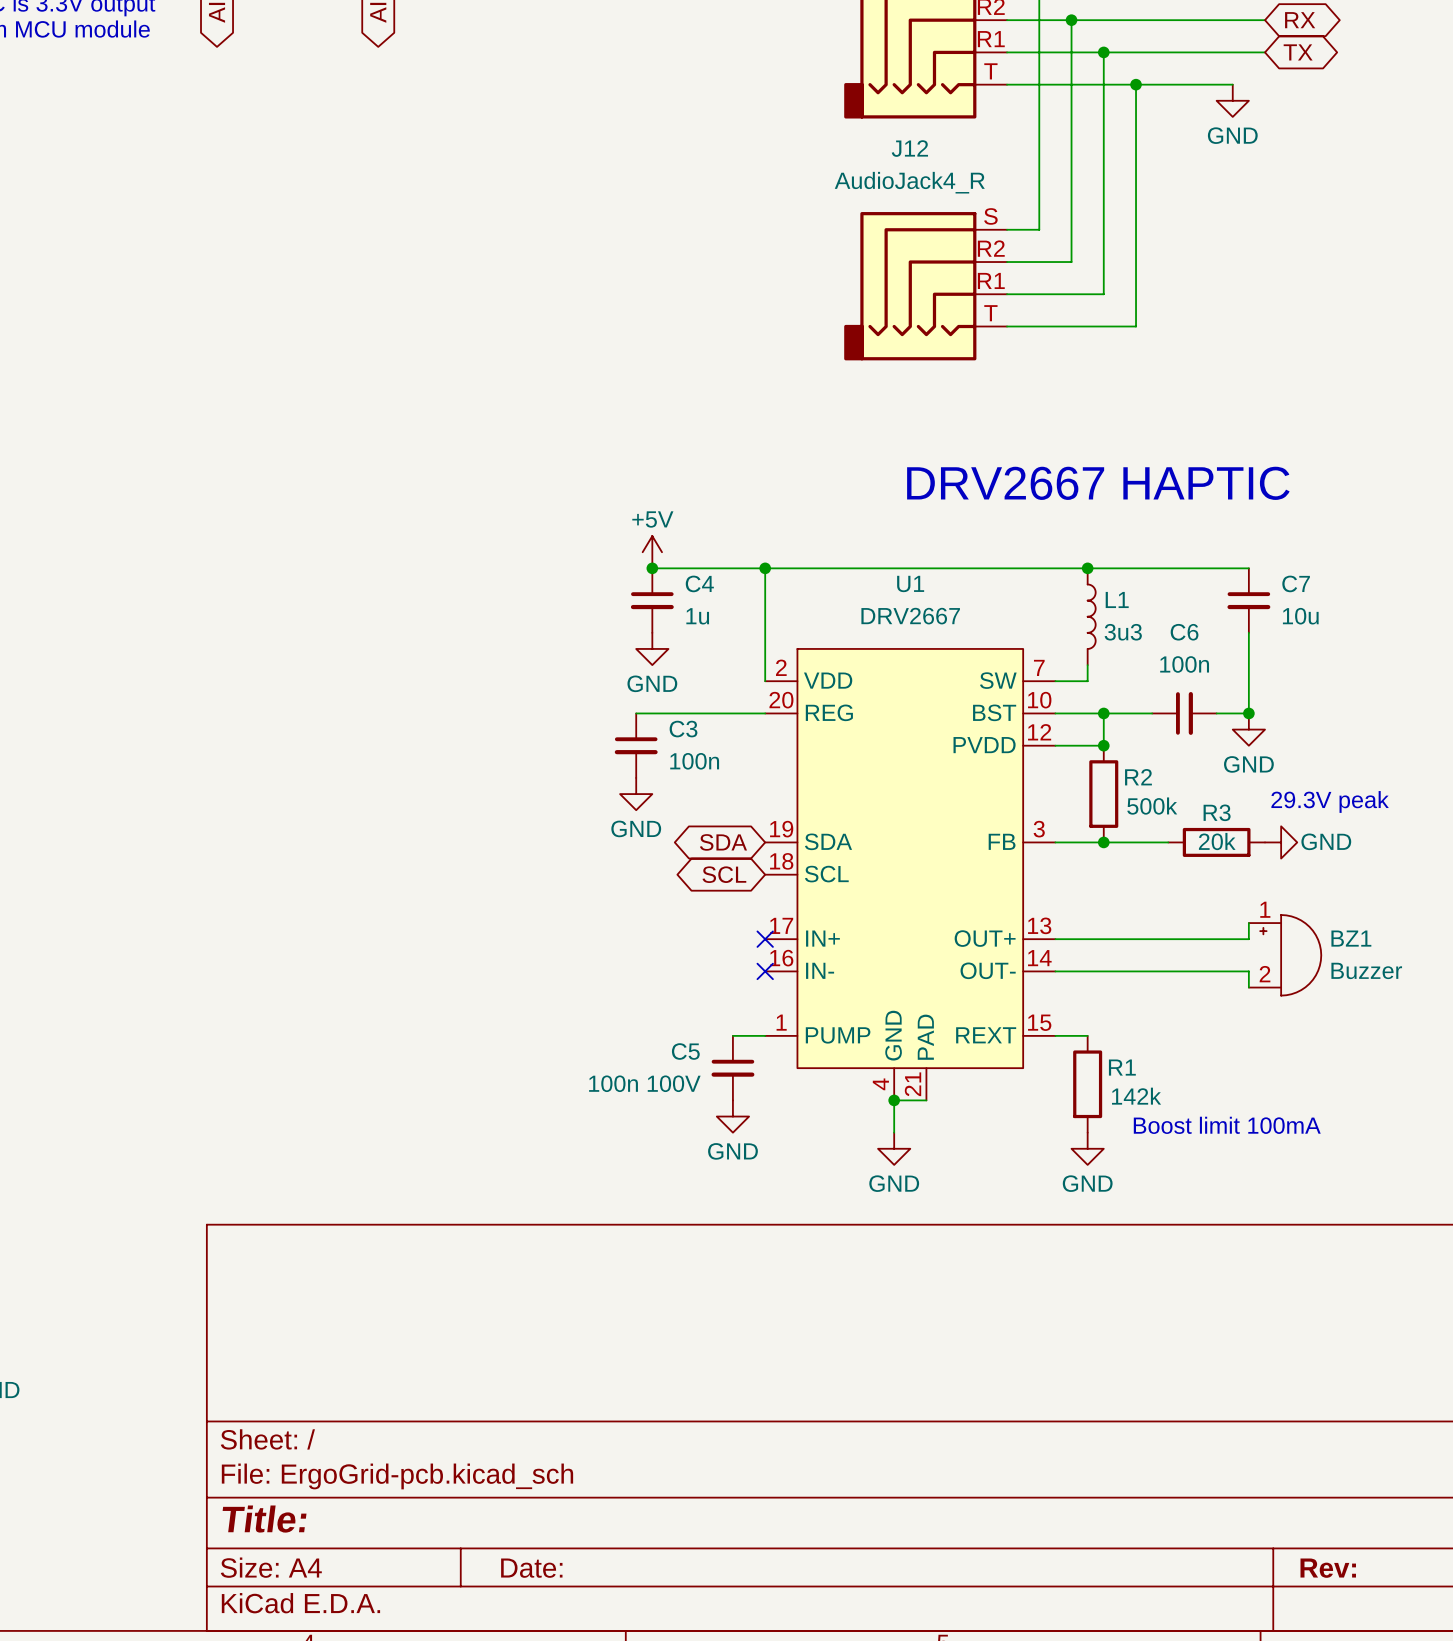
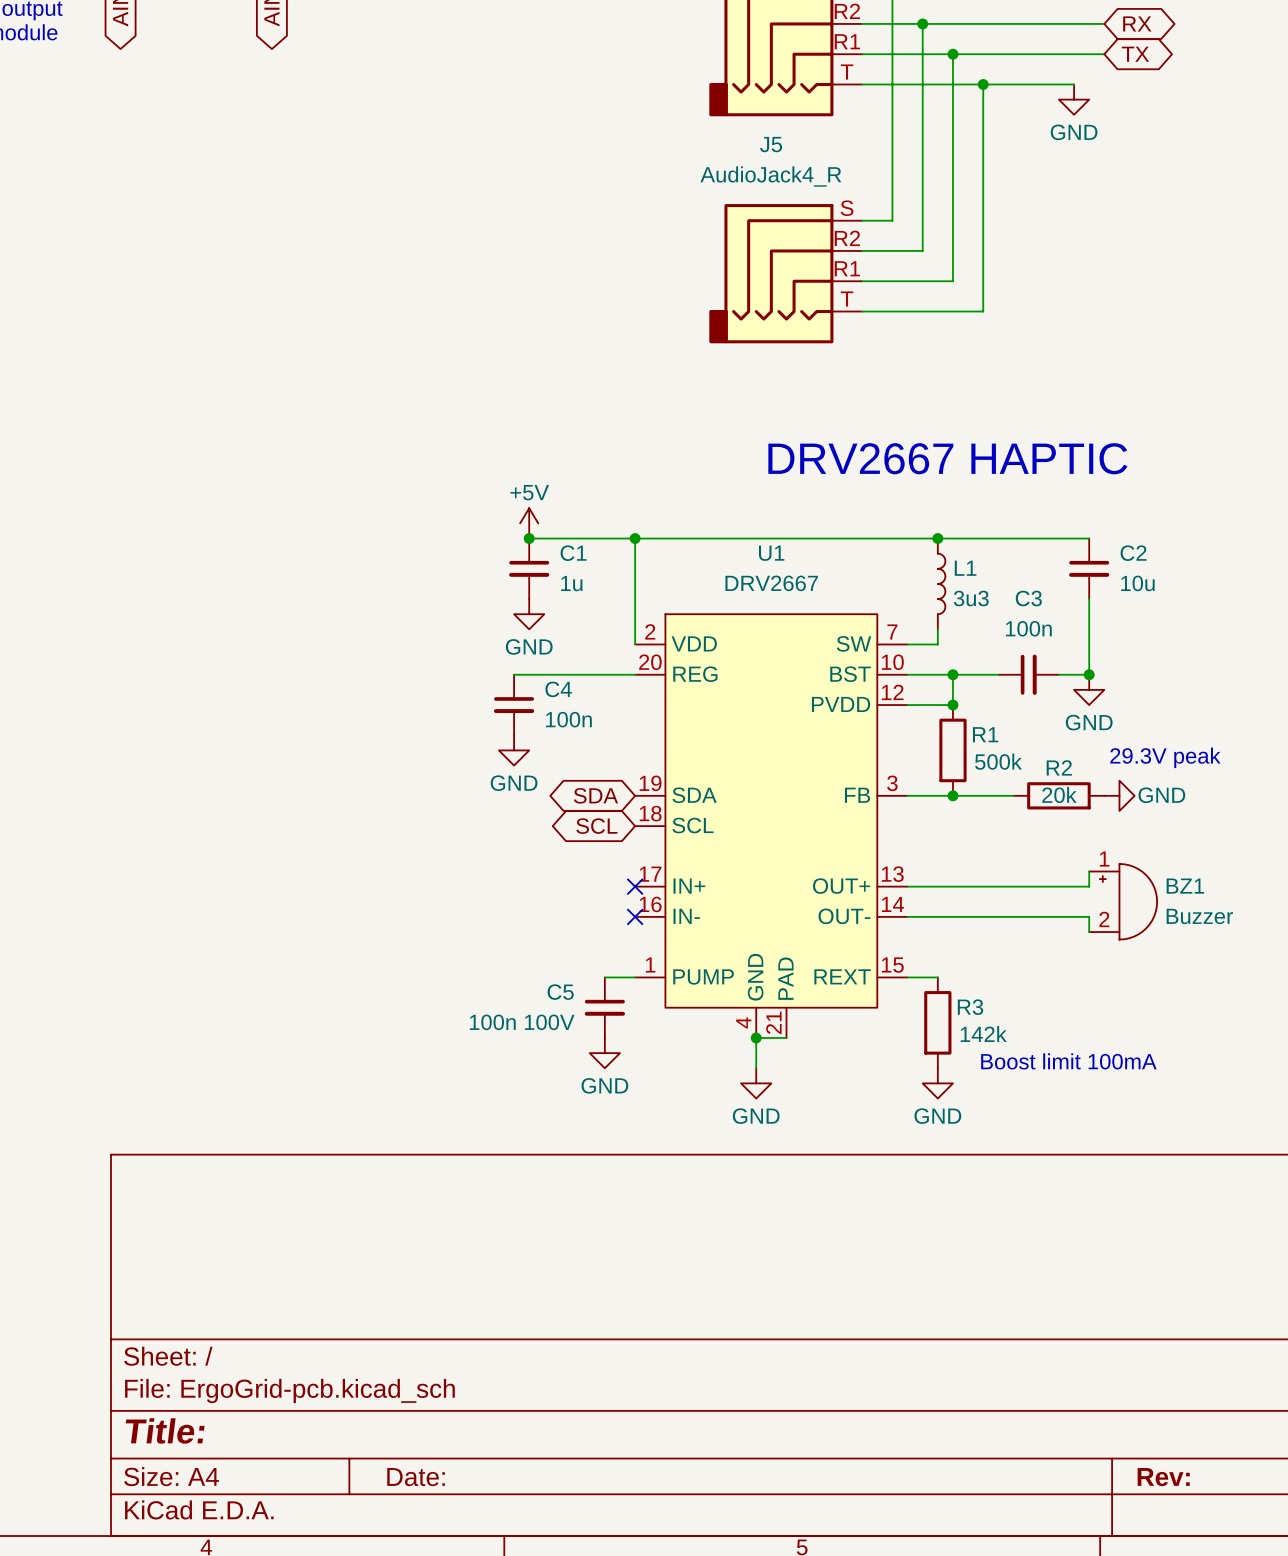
J12 name: J12 (909, 148) -> J5 (771, 144)
C4 name: C4 (699, 583) -> C1 (573, 553)
C7 name: C7 (1296, 583) -> C2 (1133, 553)
C6 name: C6 (1184, 632) -> C3 (1028, 598)
C3 name: C3 (683, 729) -> C4 (558, 689)
R2 name: R2 (1138, 777) -> R1 (985, 734)
R3 name: R3 (1217, 812) -> R2 (1059, 767)
R1 name: R1 (1122, 1067) -> R3 (970, 1007)

